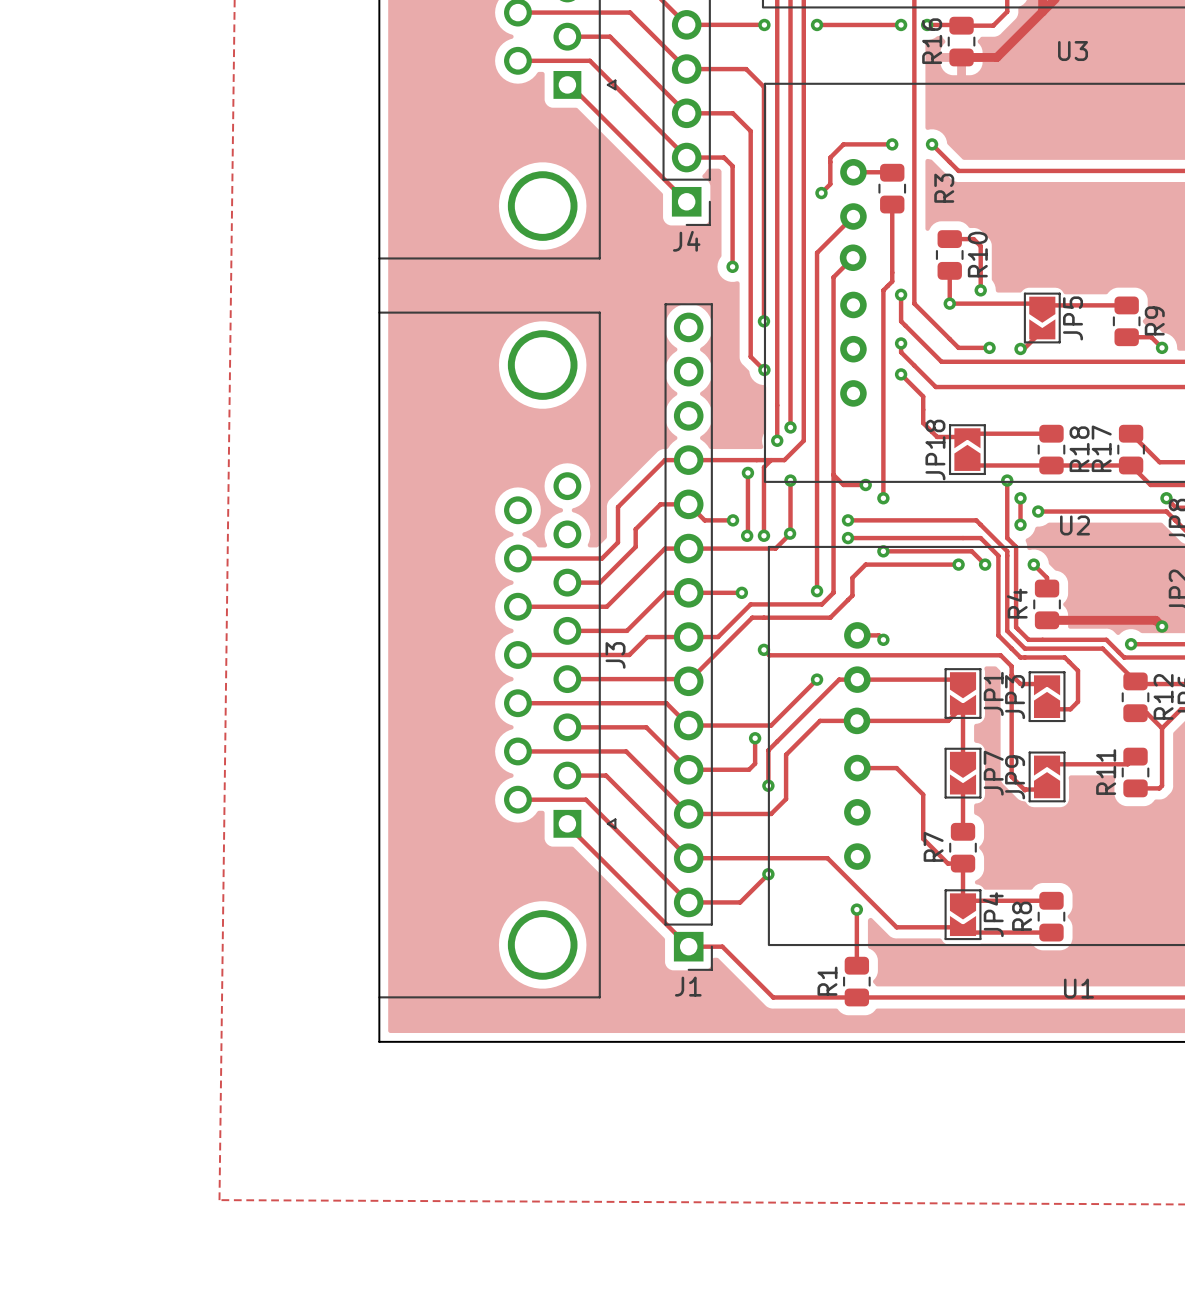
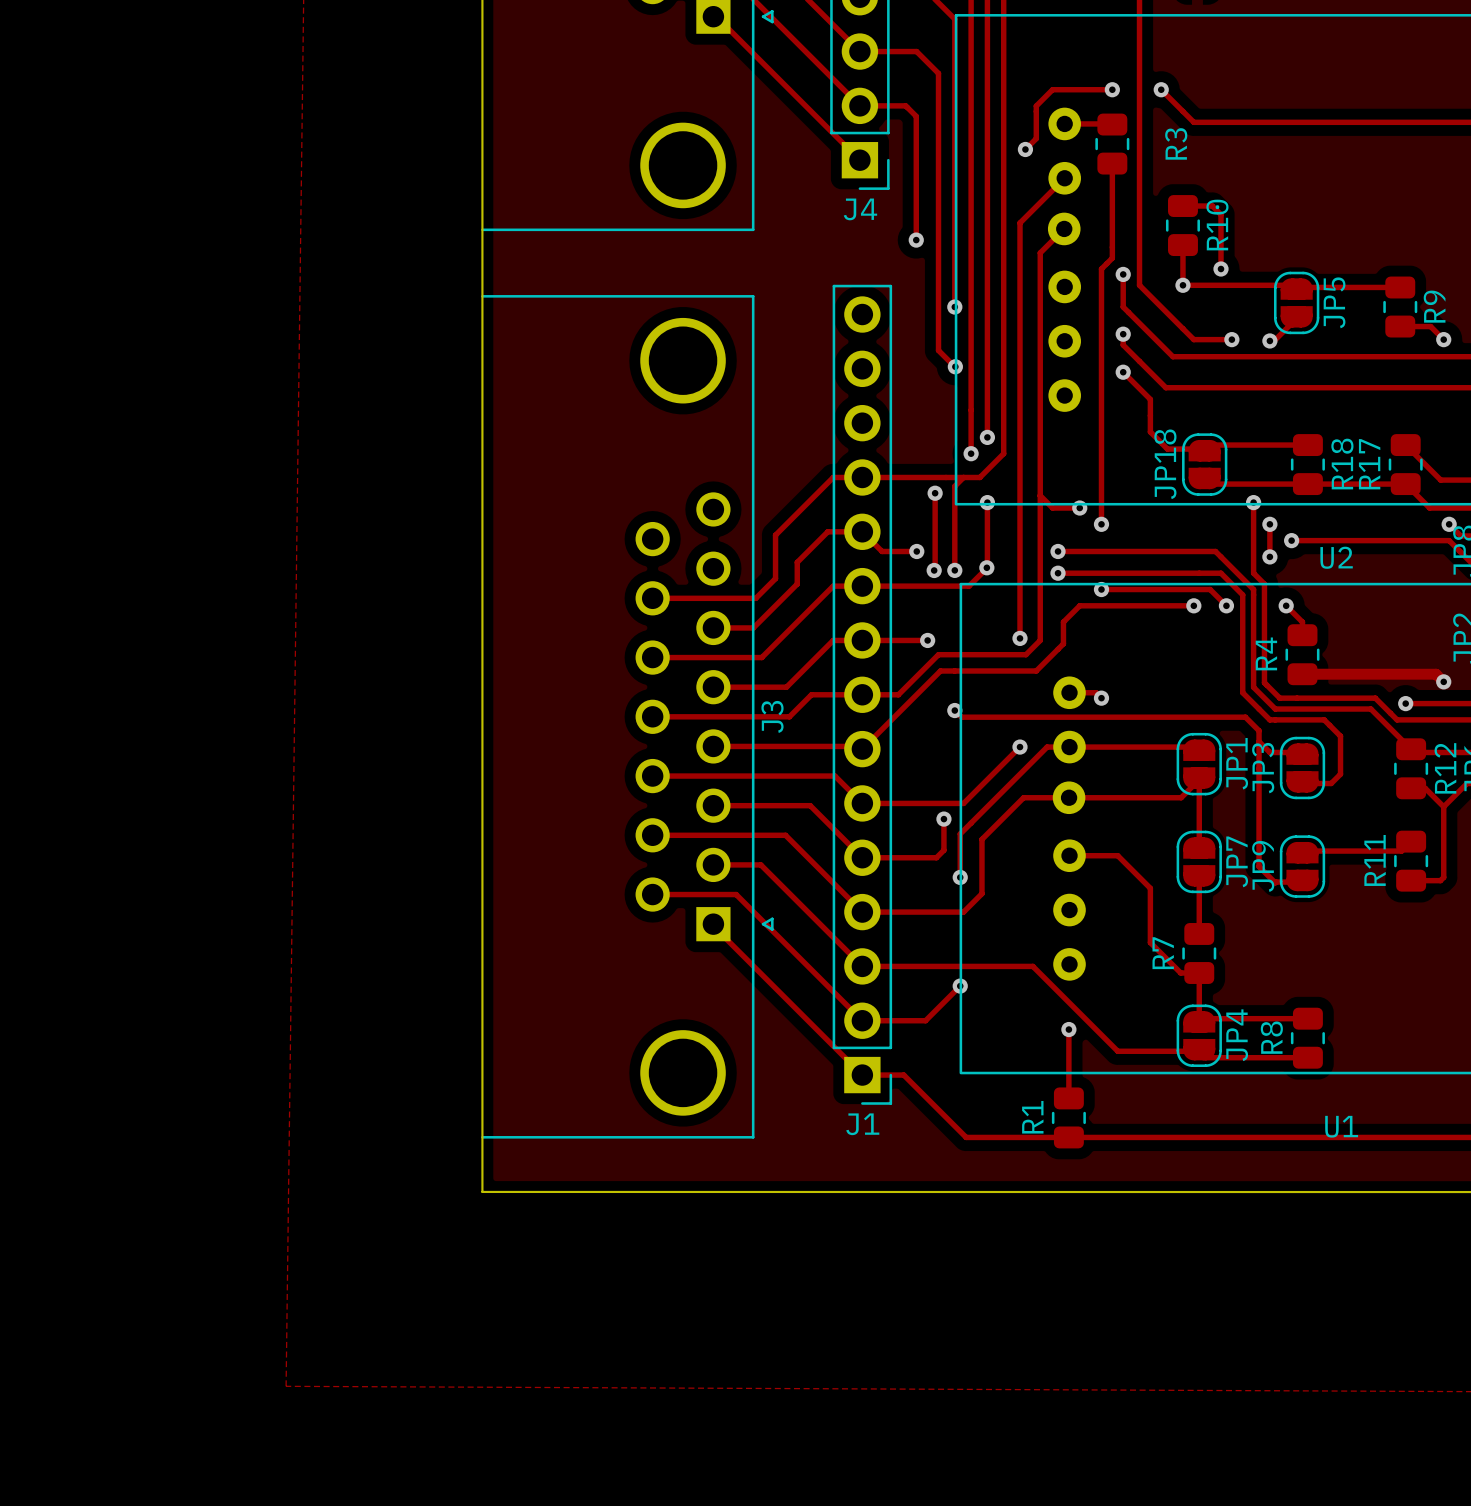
JP5 footprint: [1023, 292, 1061, 344] -> [1273, 271, 1320, 335]
JP18 footprint: [948, 424, 986, 476] -> [1182, 433, 1228, 496]
JP1 footprint: [944, 668, 982, 719] -> [1176, 732, 1222, 796]
JP3 footprint: [1028, 671, 1066, 723] -> [1279, 736, 1326, 800]
JP7 footprint: [944, 747, 982, 799] -> [1176, 830, 1222, 894]
JP9 footprint: [1028, 751, 1066, 803] -> [1279, 835, 1326, 898]
JP4 footprint: [944, 889, 982, 941] -> [1176, 1004, 1222, 1067]

